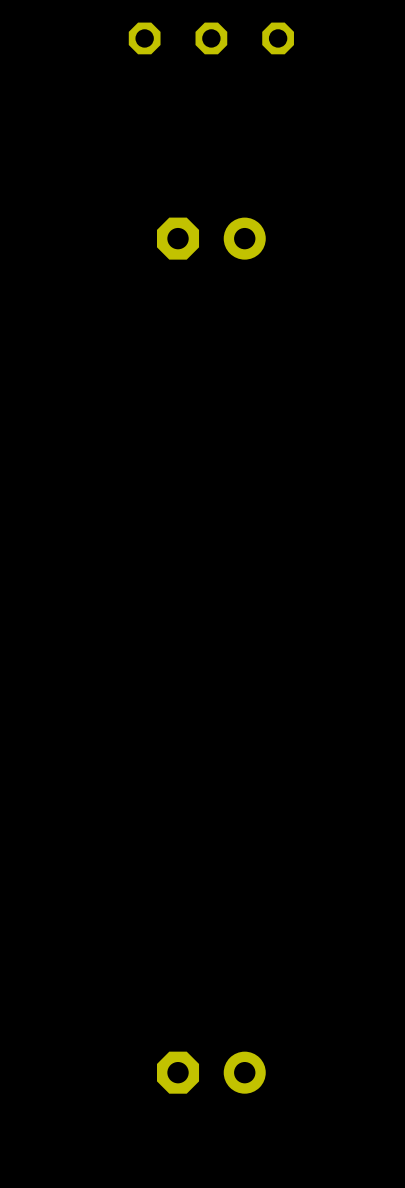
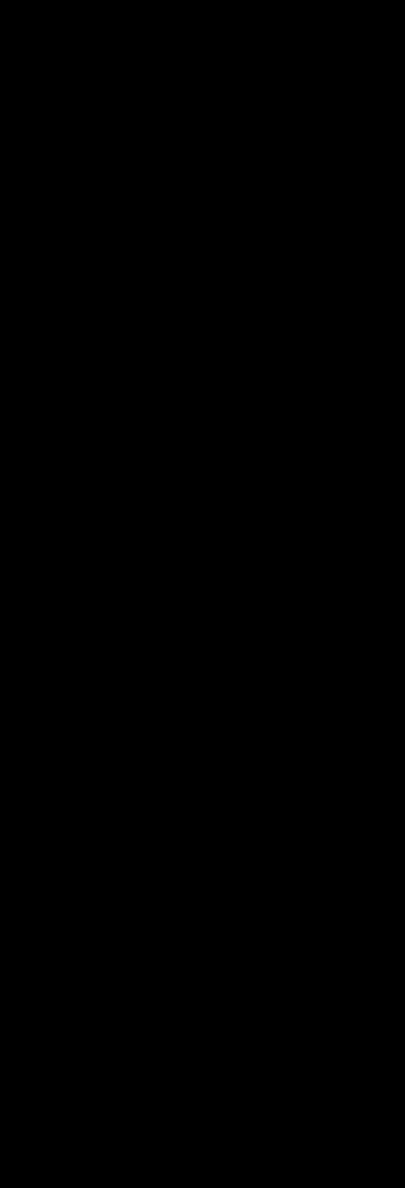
part: (211, 38) -> none
part: (211, 238) -> none
part: (211, 1072) -> none

